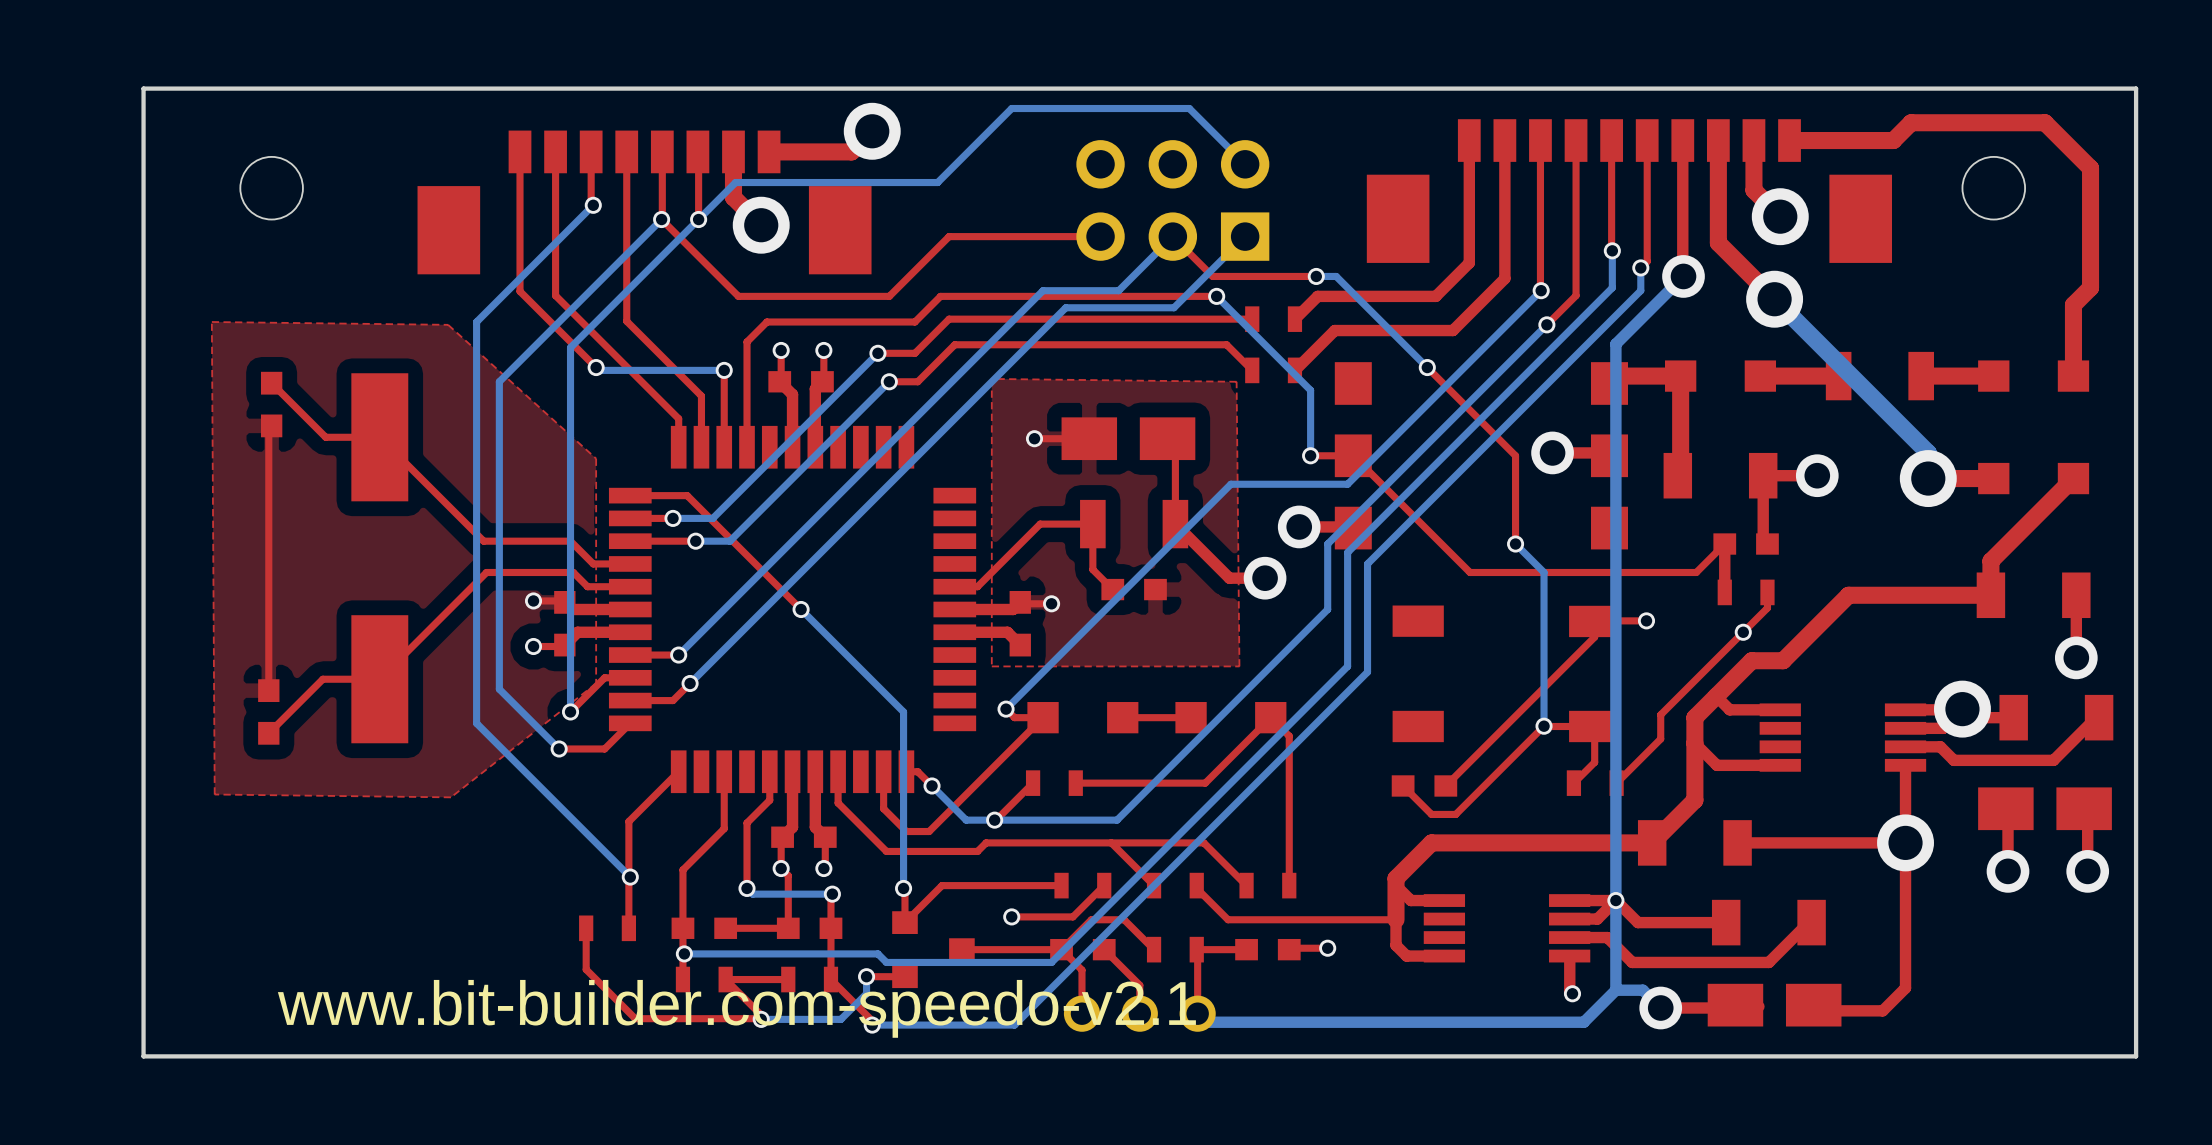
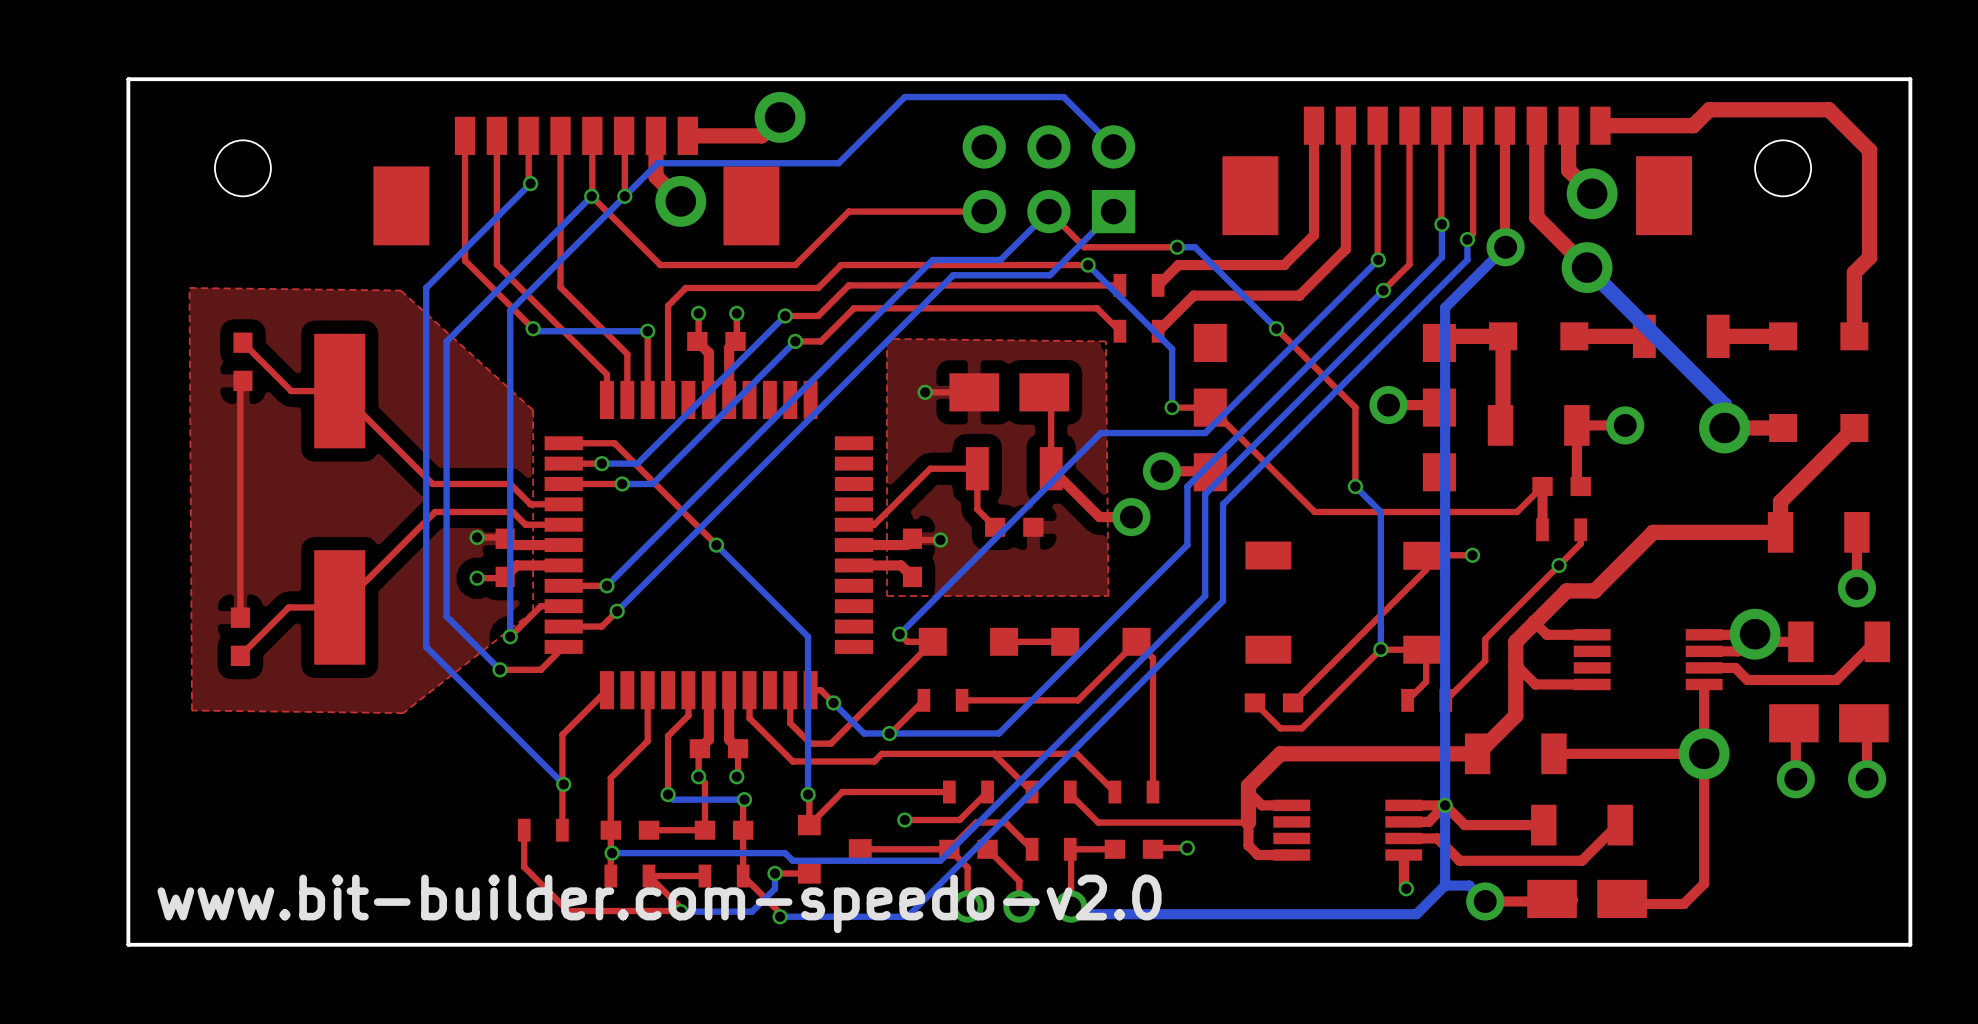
text: www.bit-builder.com-speedo-v2.1 (736, 1008) -> www.bit-builder.com-speedo-v2.0 (659, 903)

